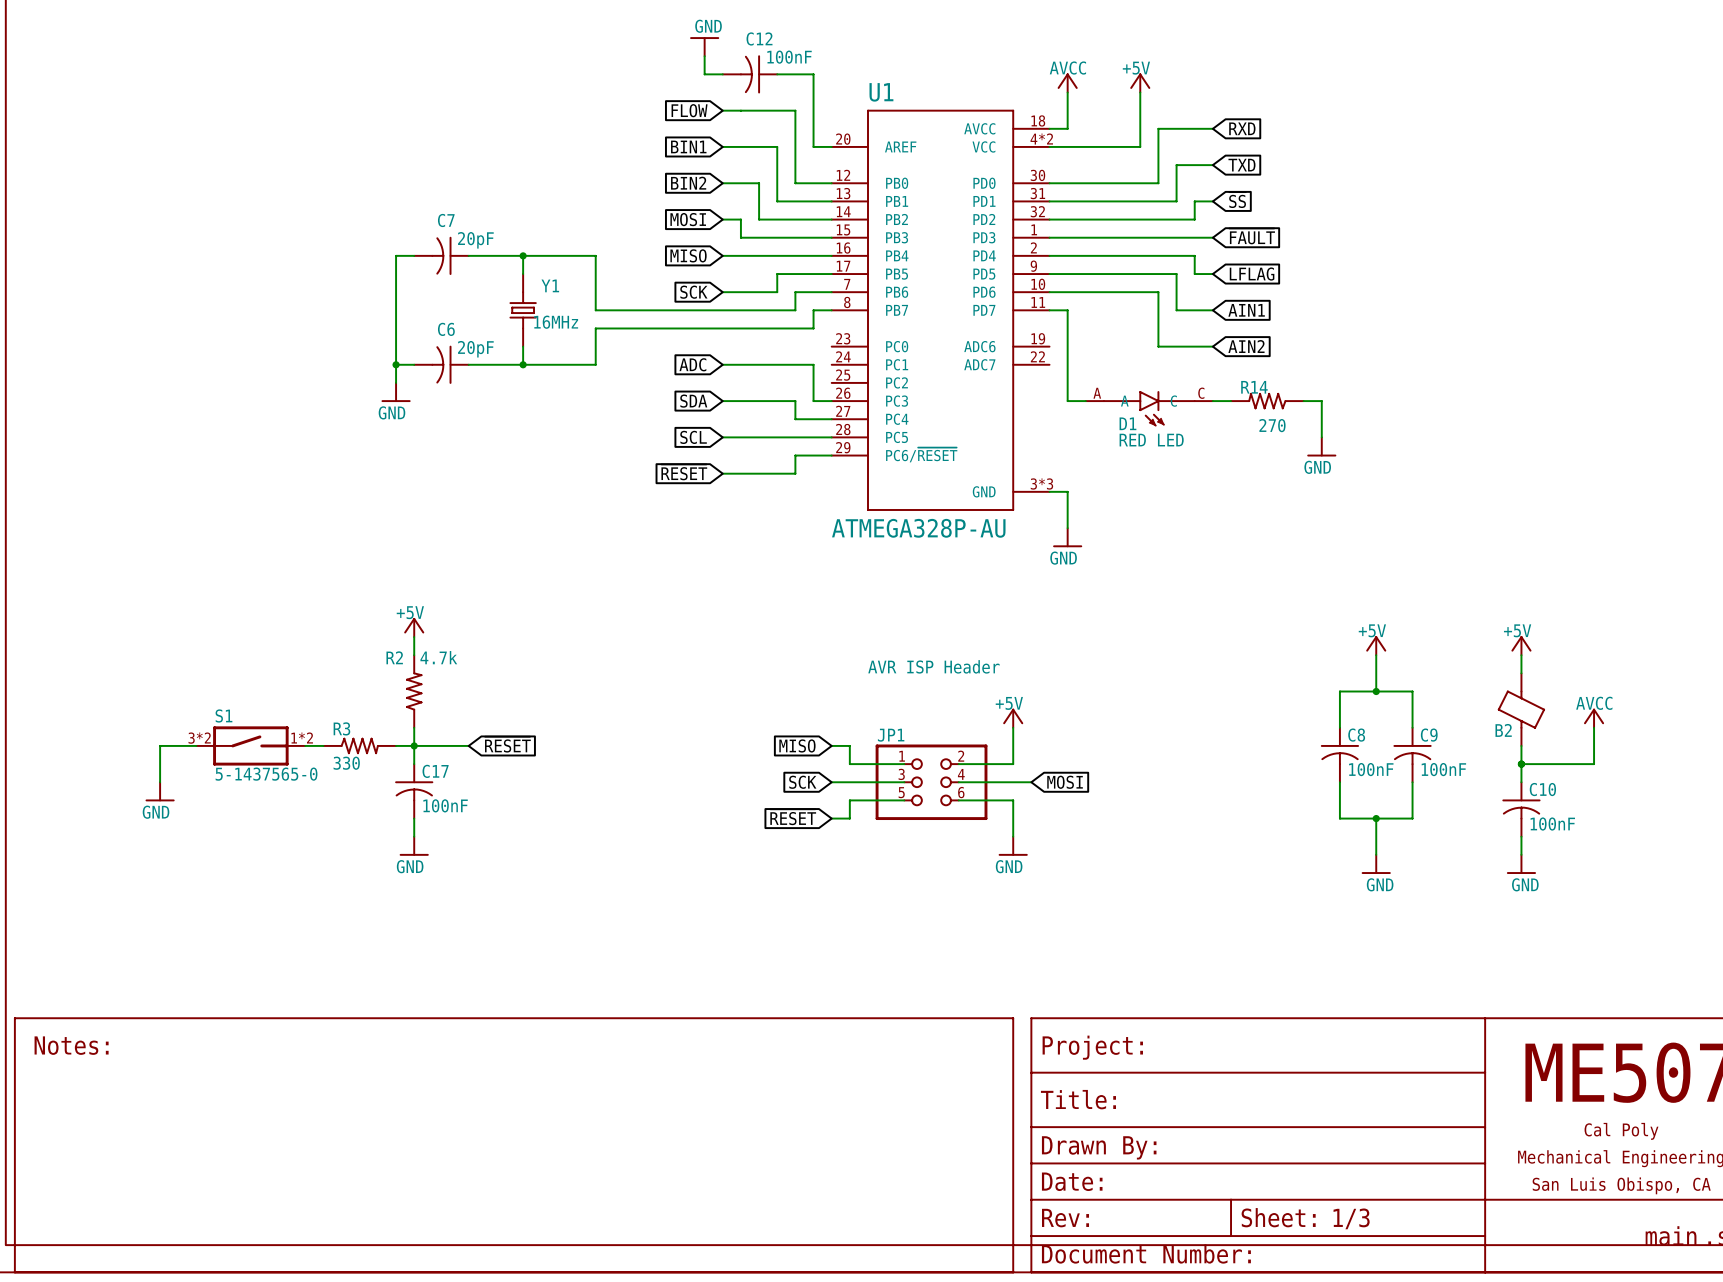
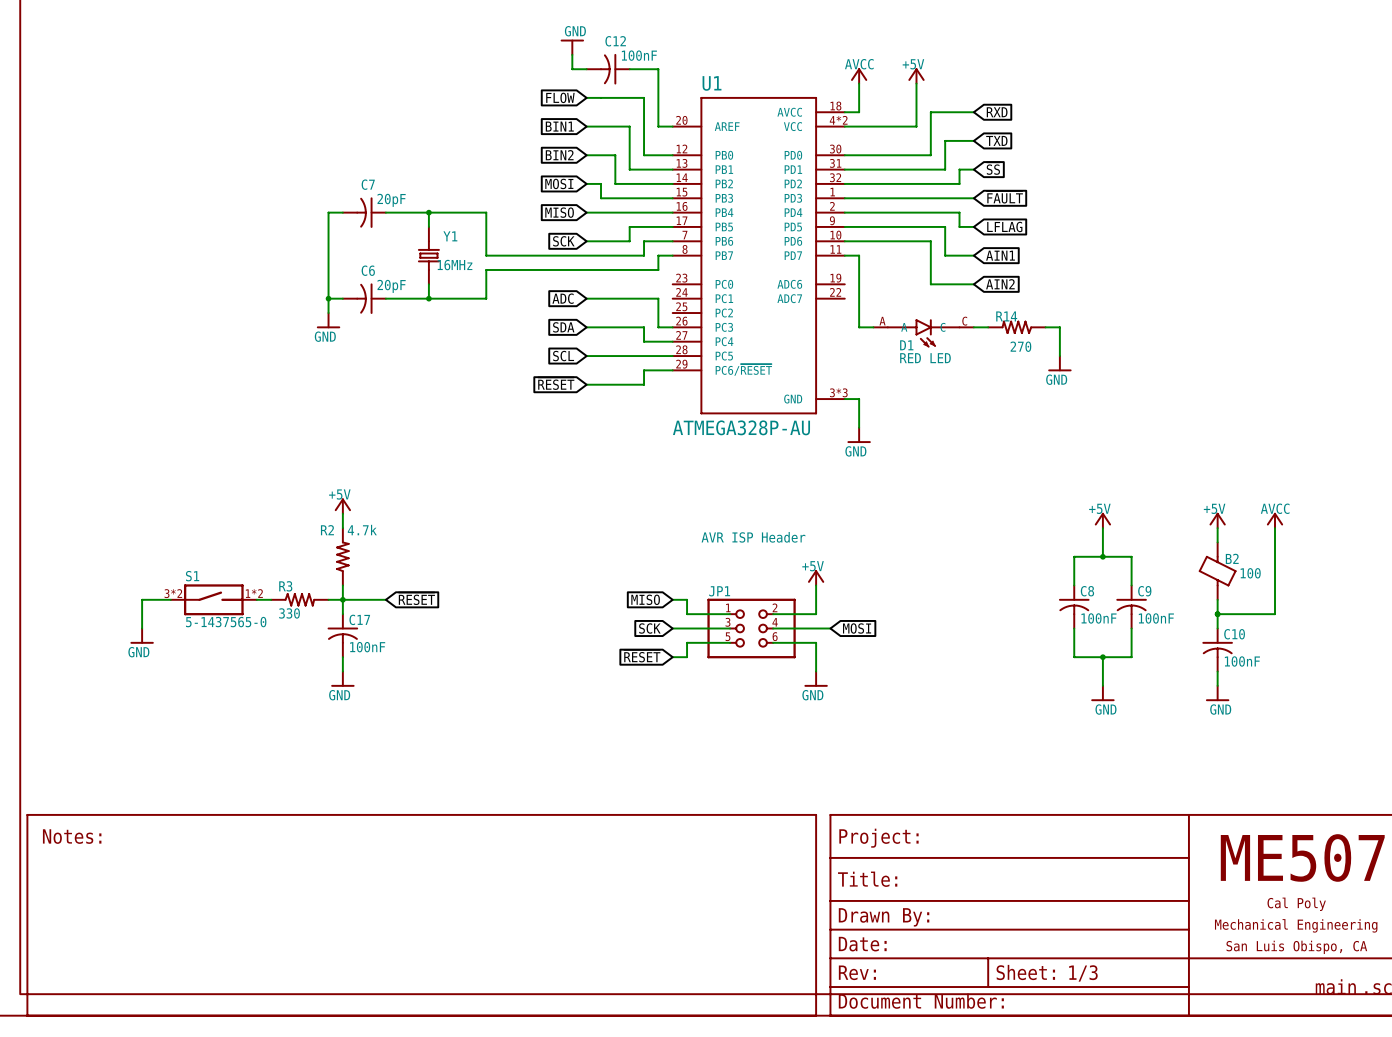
wire: none -> (1275, 528) (1275, 585)
B2 value: none -> 100 (1250, 573)
power symbol position: AVCC (1594, 718) -> AVCC (1275, 520)
B2 name position: B2 (1503, 730) -> B2 (1232, 558)

